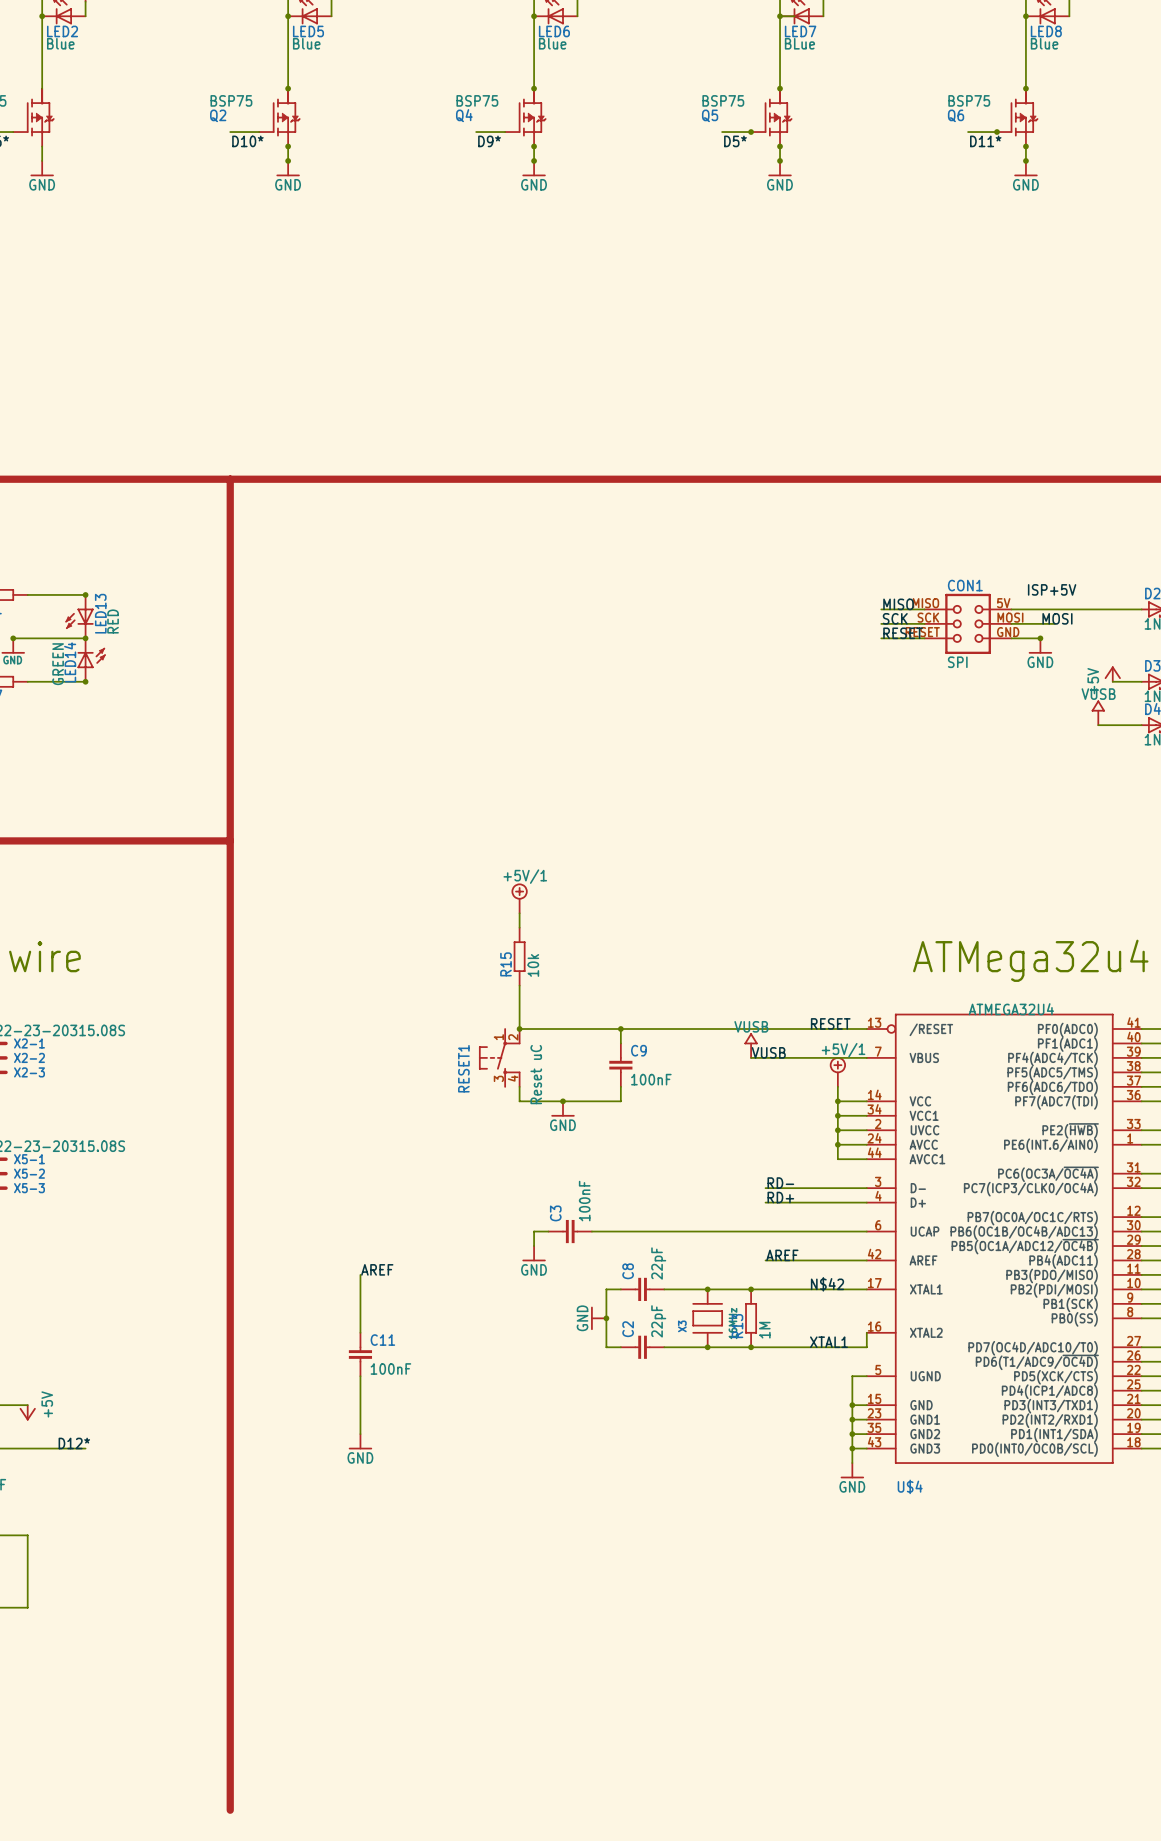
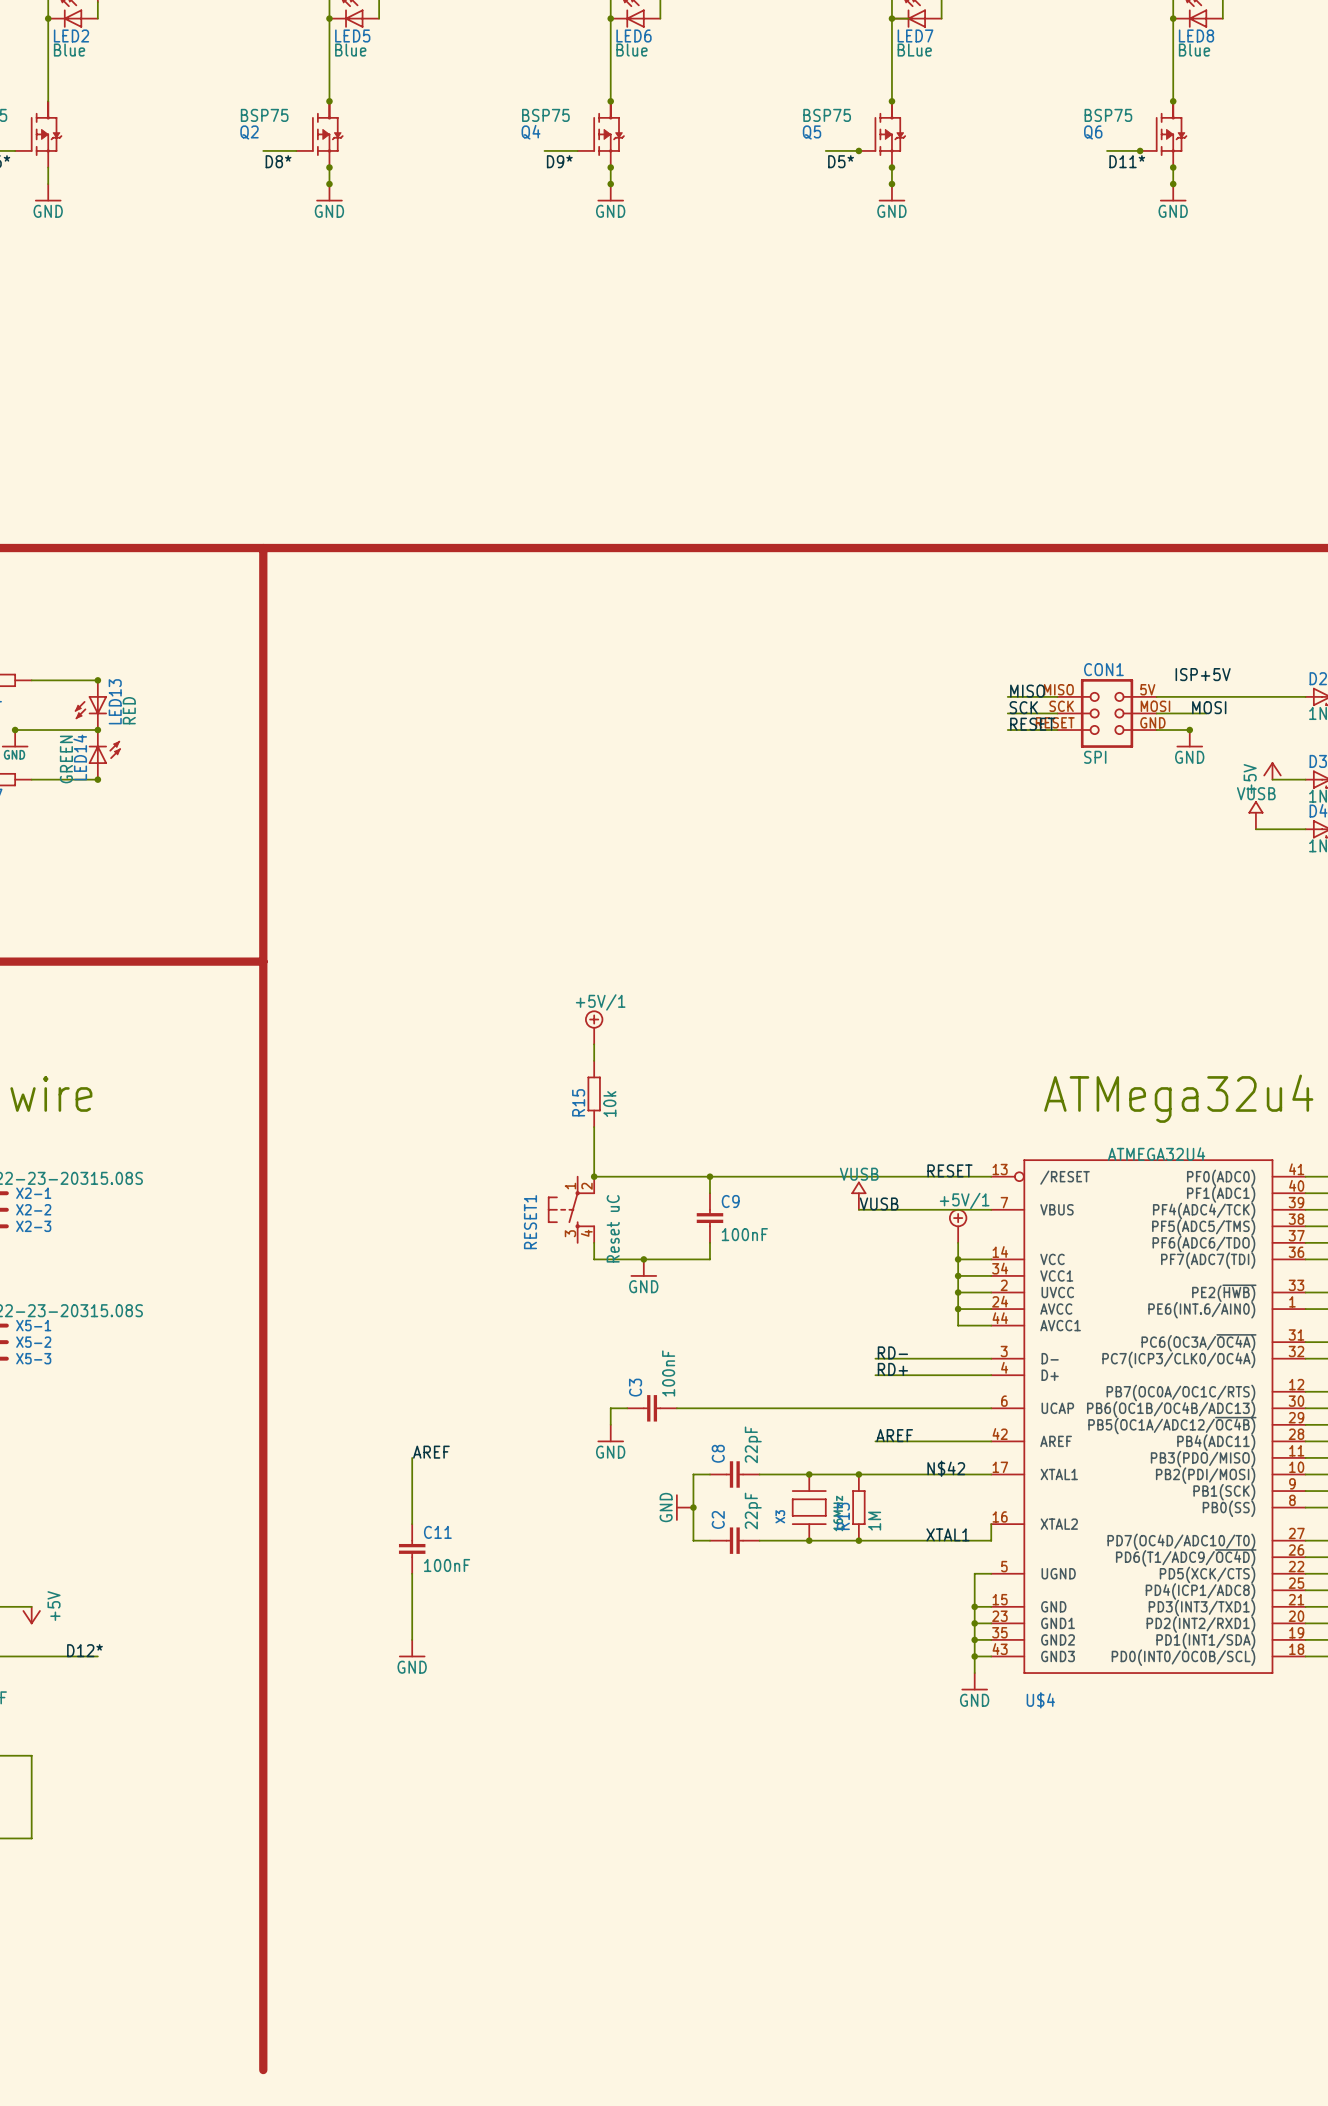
label: D10* (247, 141) -> D8* (278, 161)

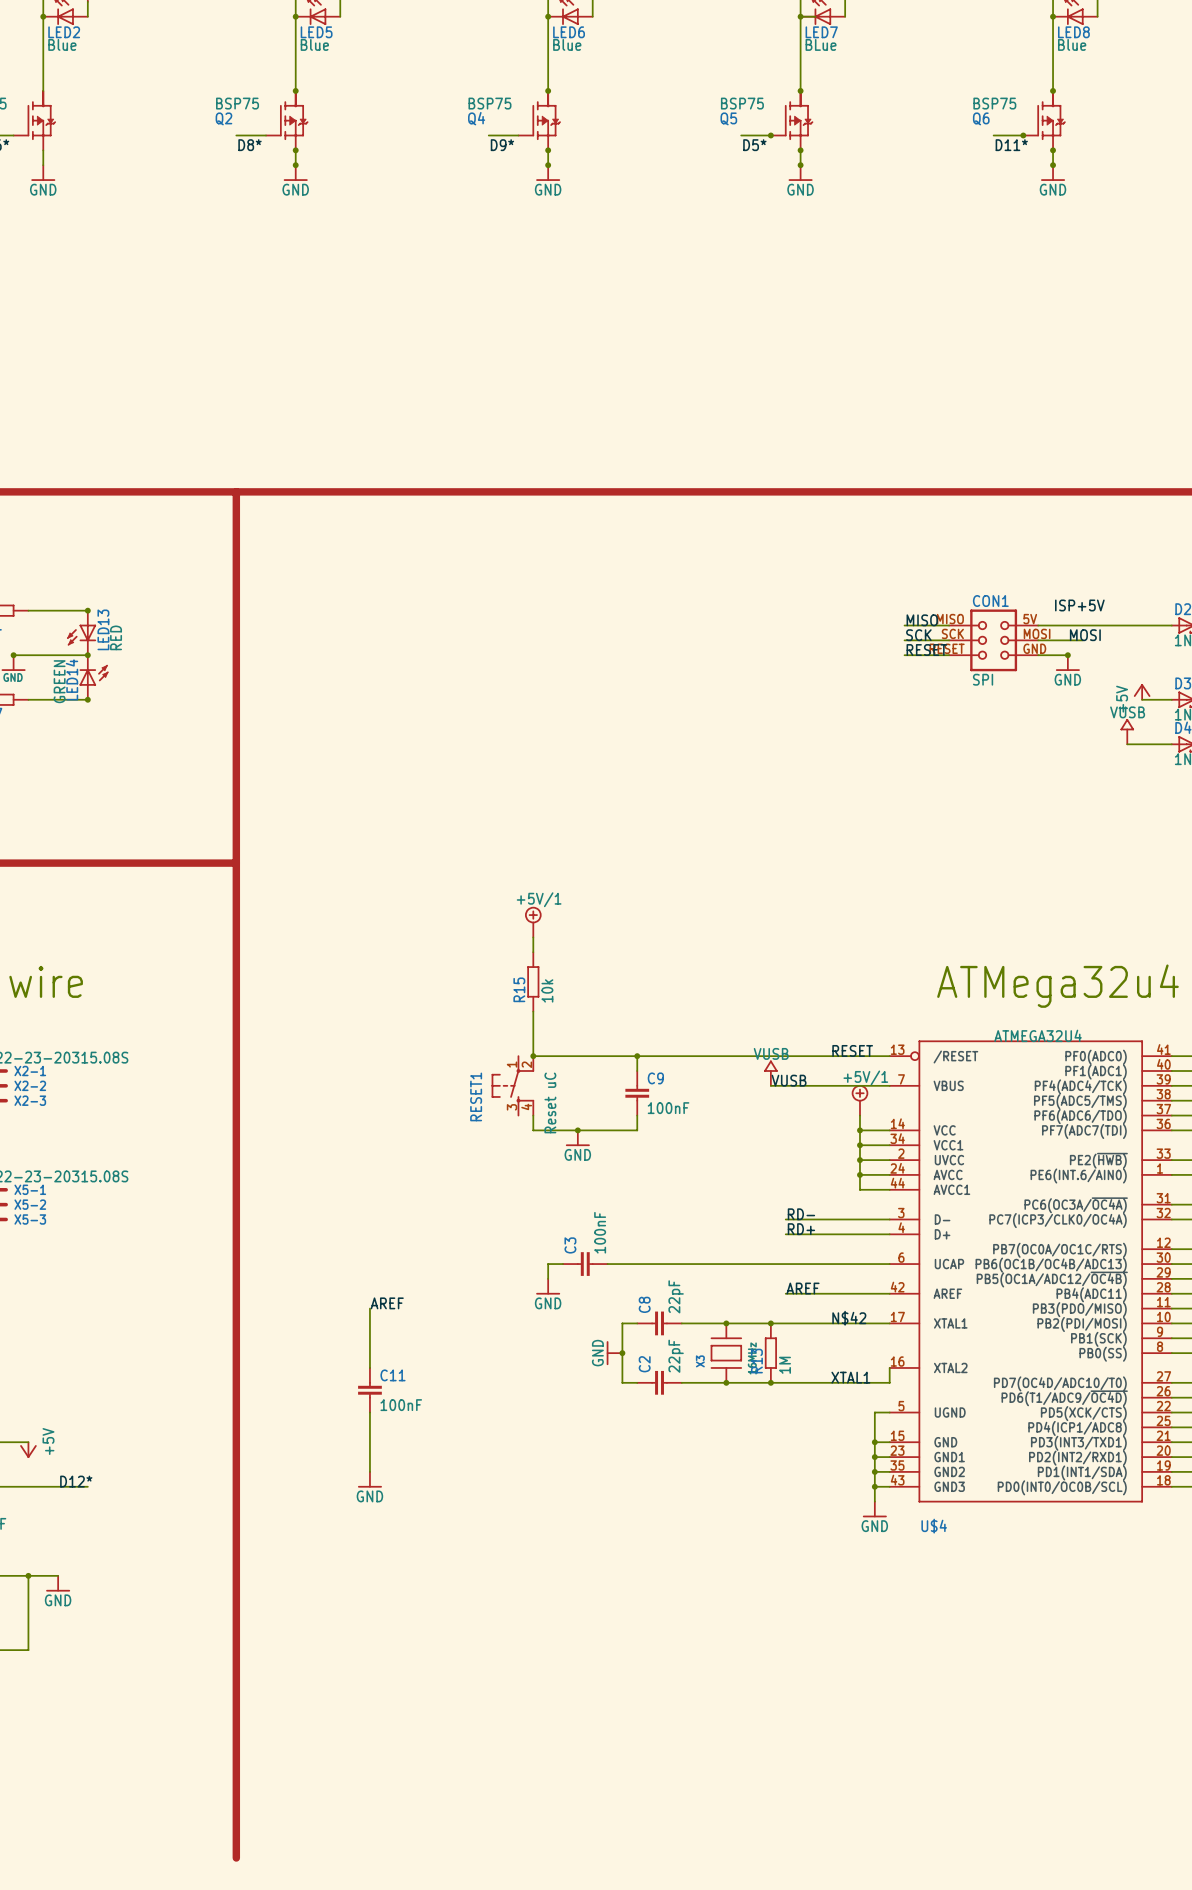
wire: none -> (28, 1575) (58, 1575)
junction: none -> (28, 1575)
power symbol: none -> GND (58, 1583)

